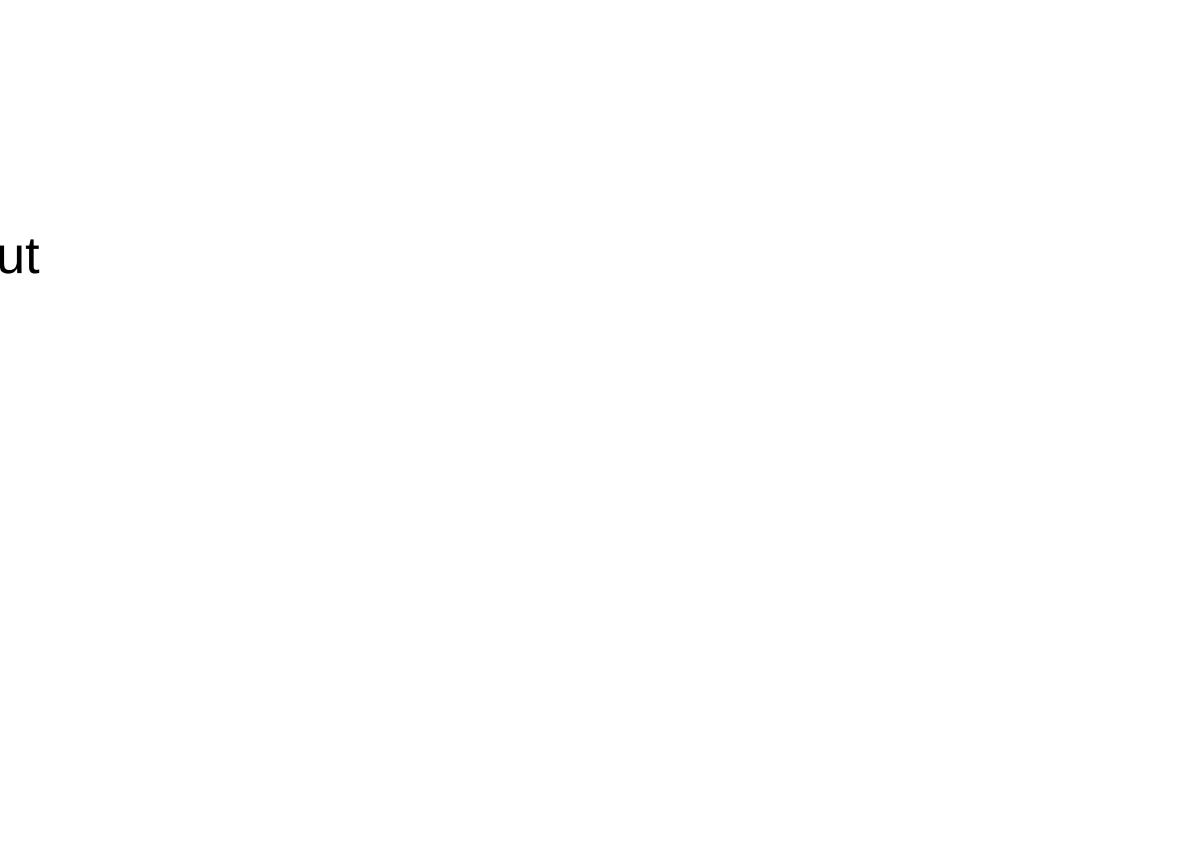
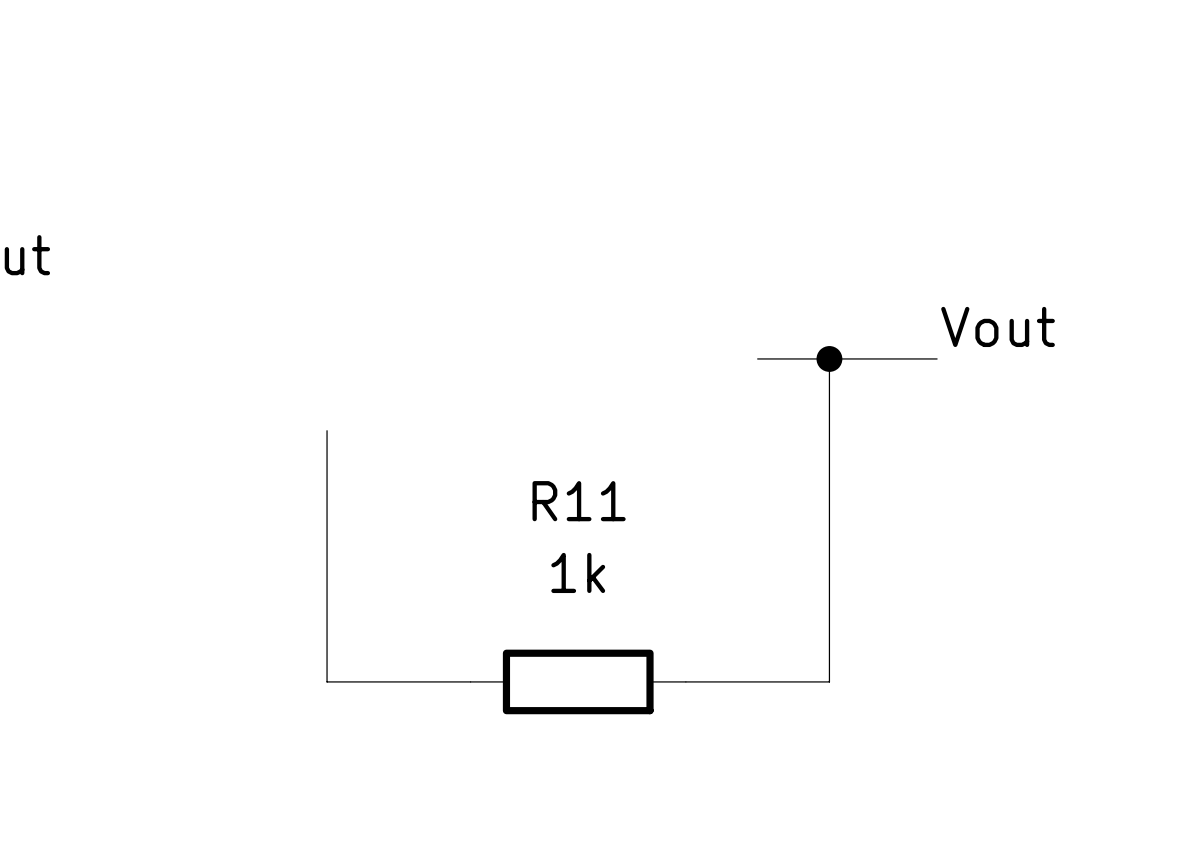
label: none -> Vout (998, 326)
wire: none -> (757, 358) (937, 358)
wire: none -> (829, 358) (829, 681) (685, 681)
junction: none -> (829, 358)
wire: none -> (327, 430) (327, 681) (470, 681)
R11: none -> 1k (578, 681)

